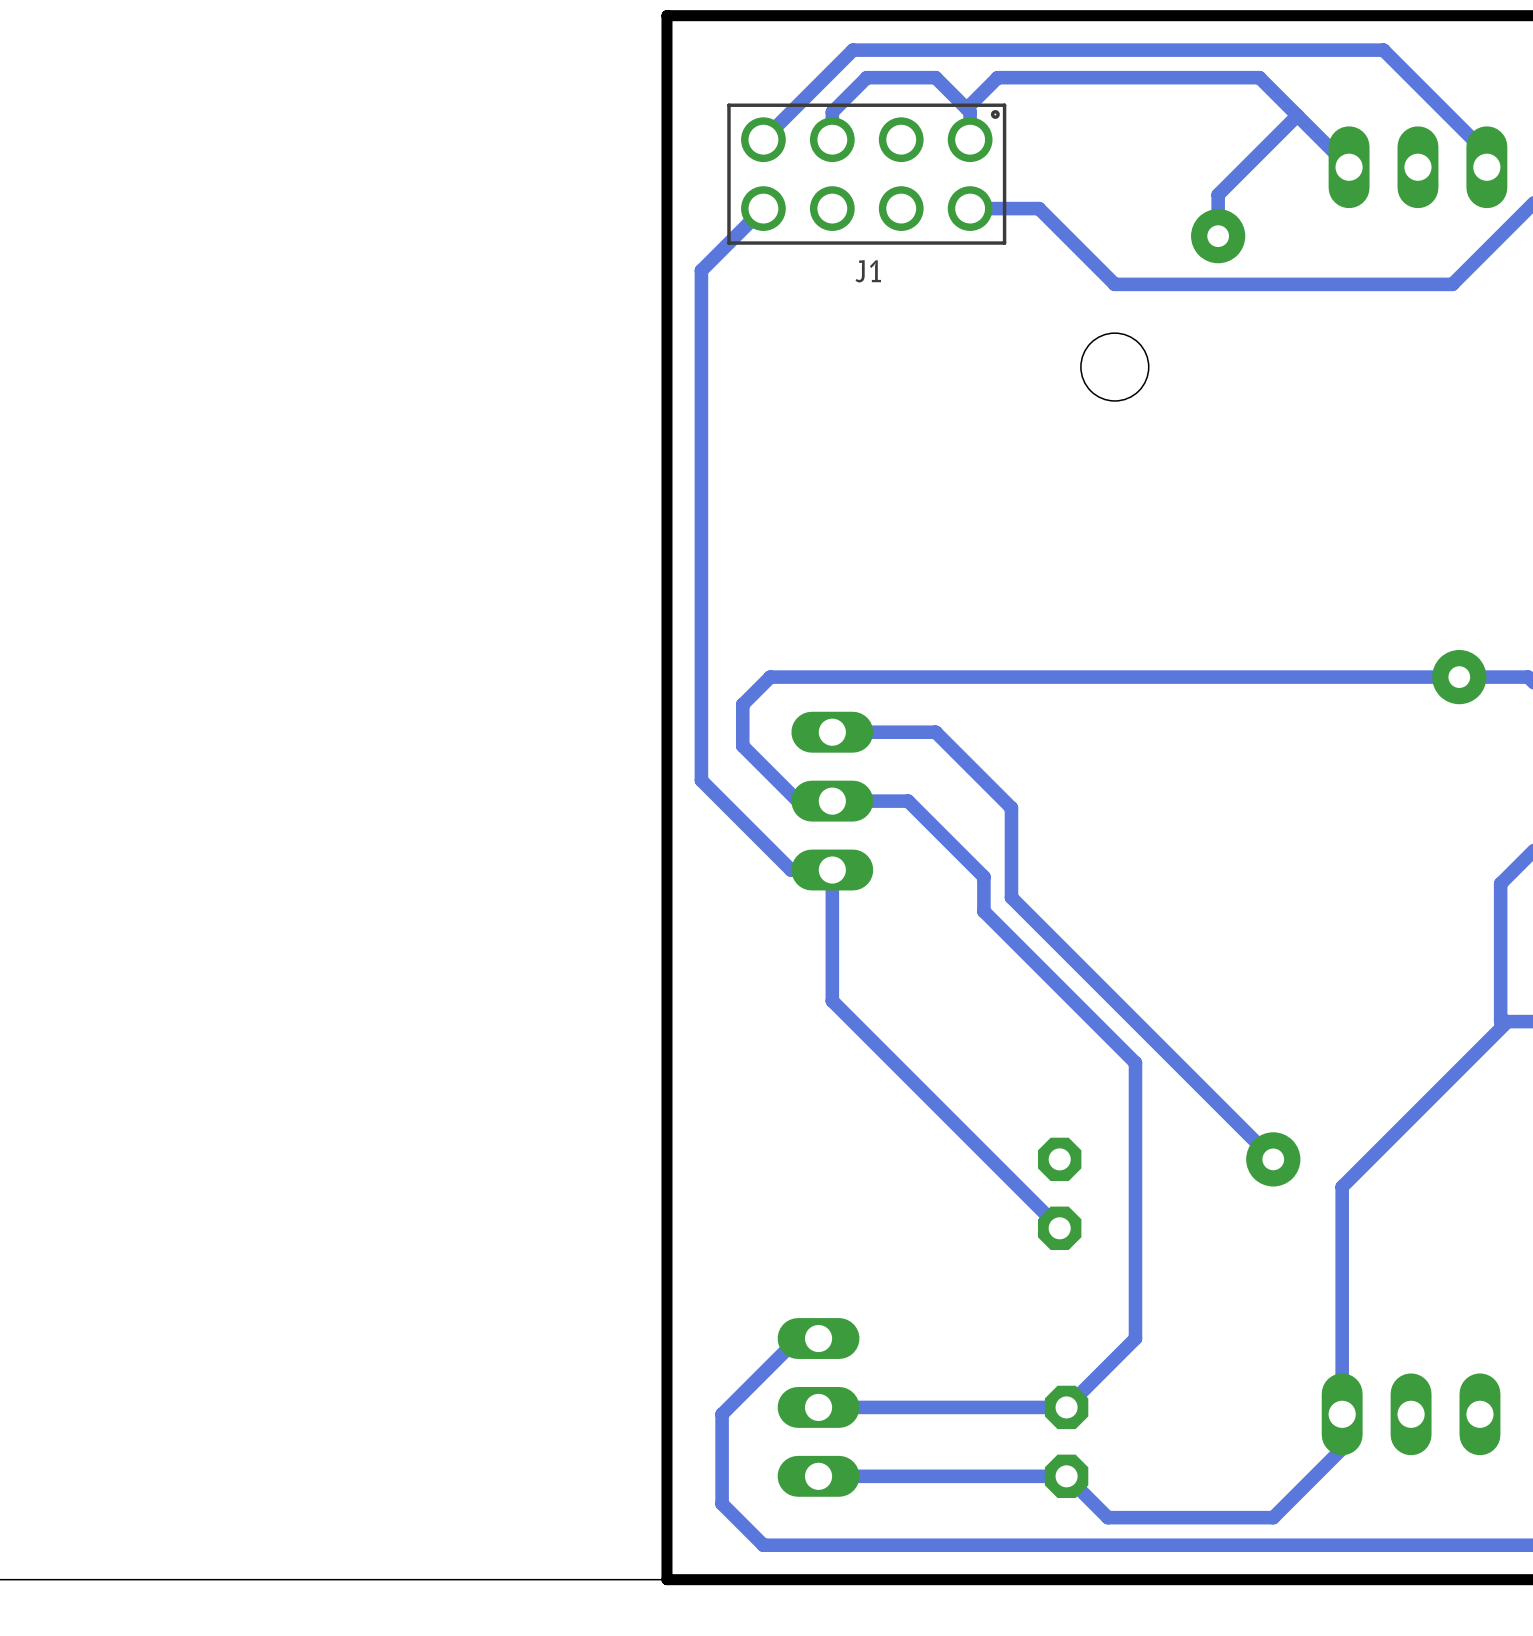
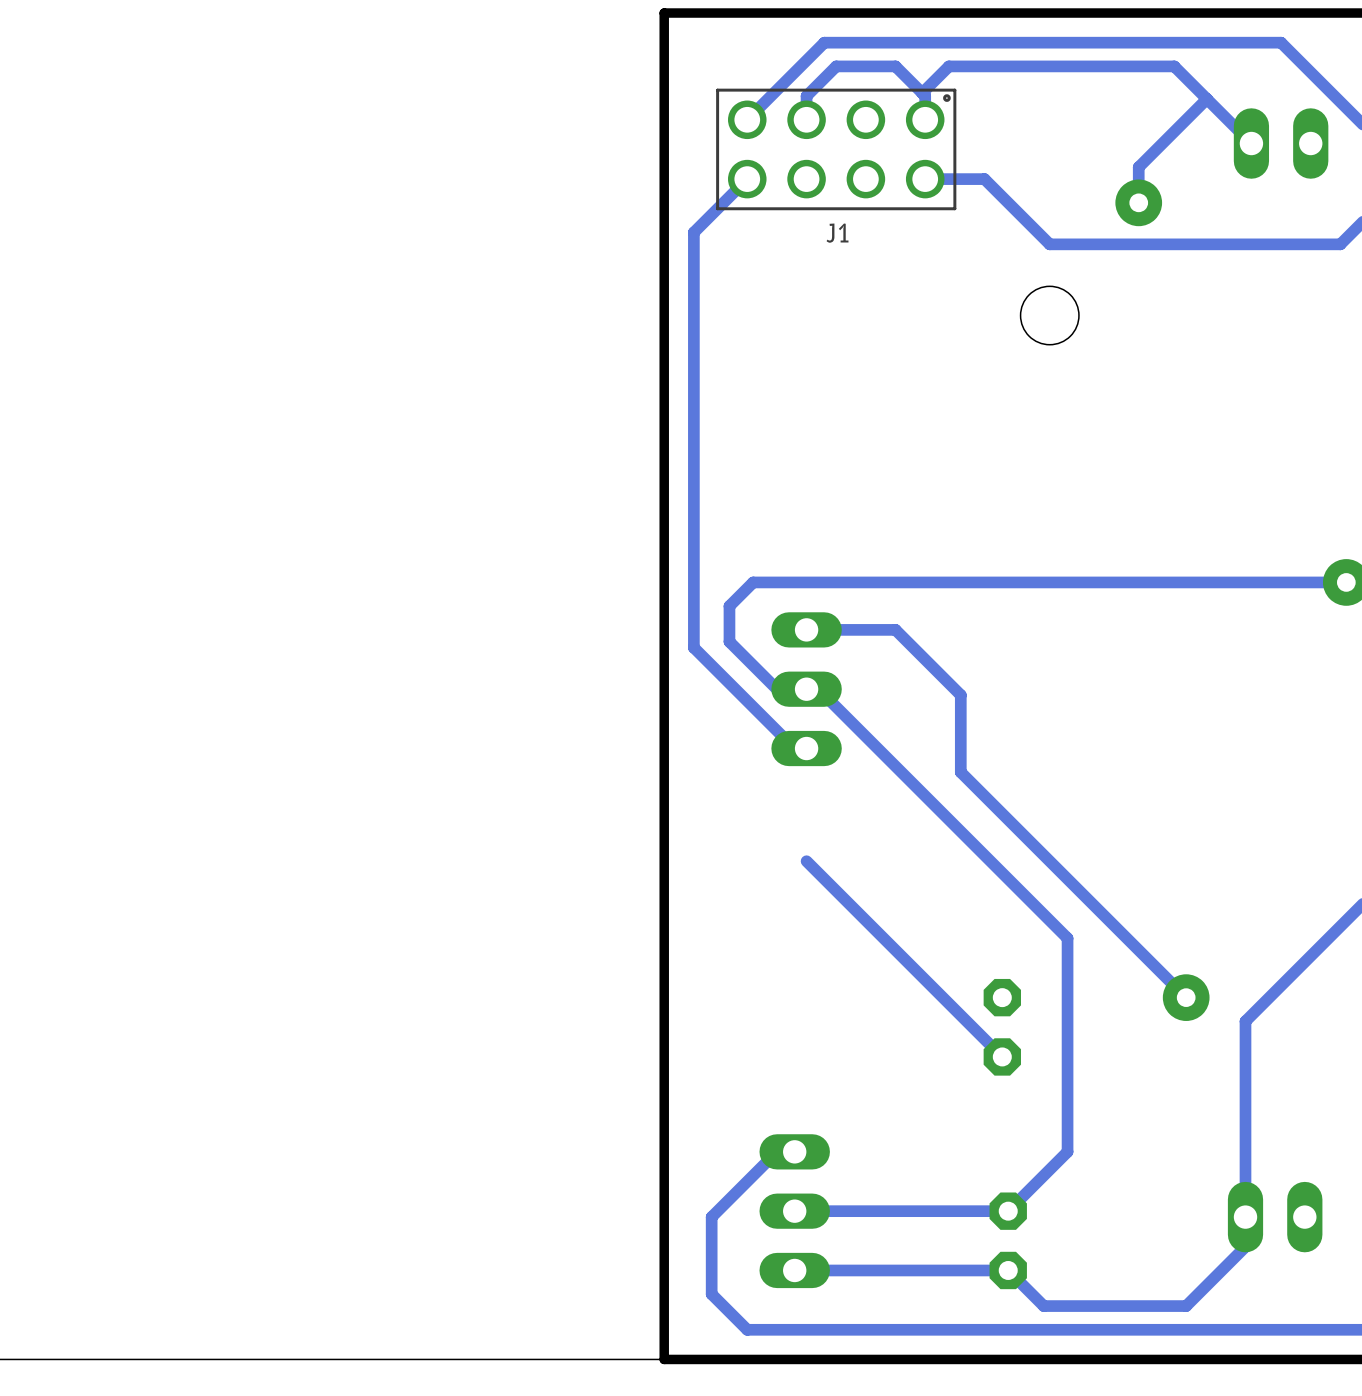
track: (701, 752) (701, 780) (790, 870) (832, 870) (832, 1000) -> (693, 647) (794, 748)
track: (797, 801) (908, 801) (983, 876) (983, 911) (1135, 1062) (1135, 1090) -> (818, 689) (1067, 938)

